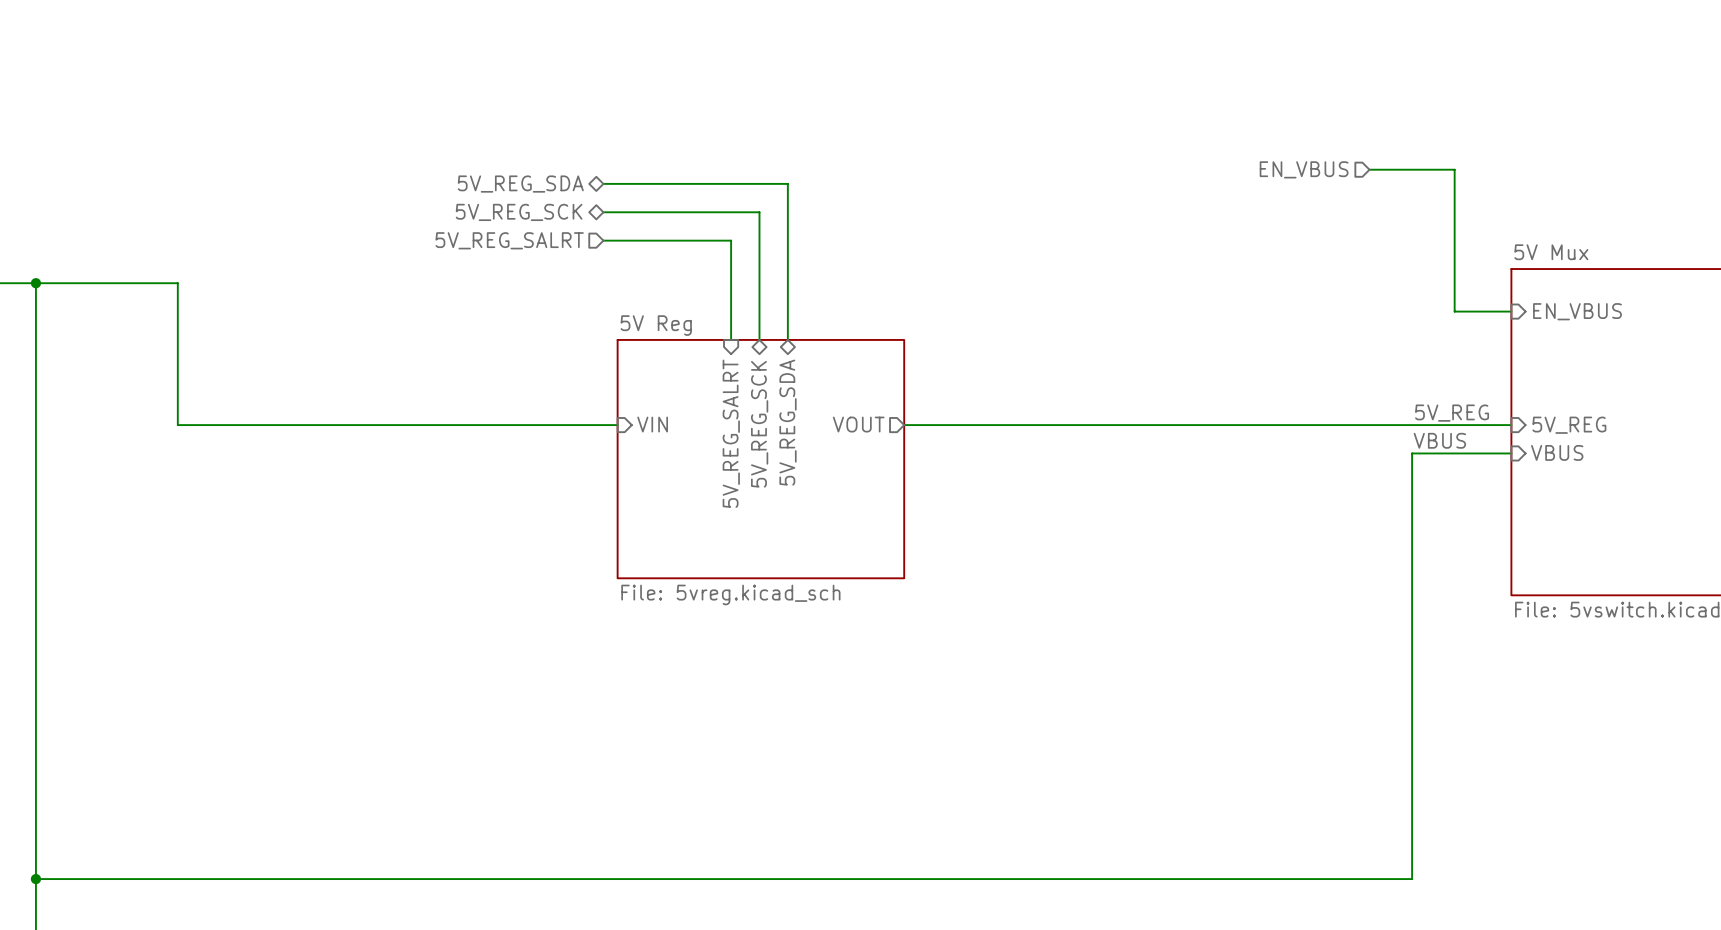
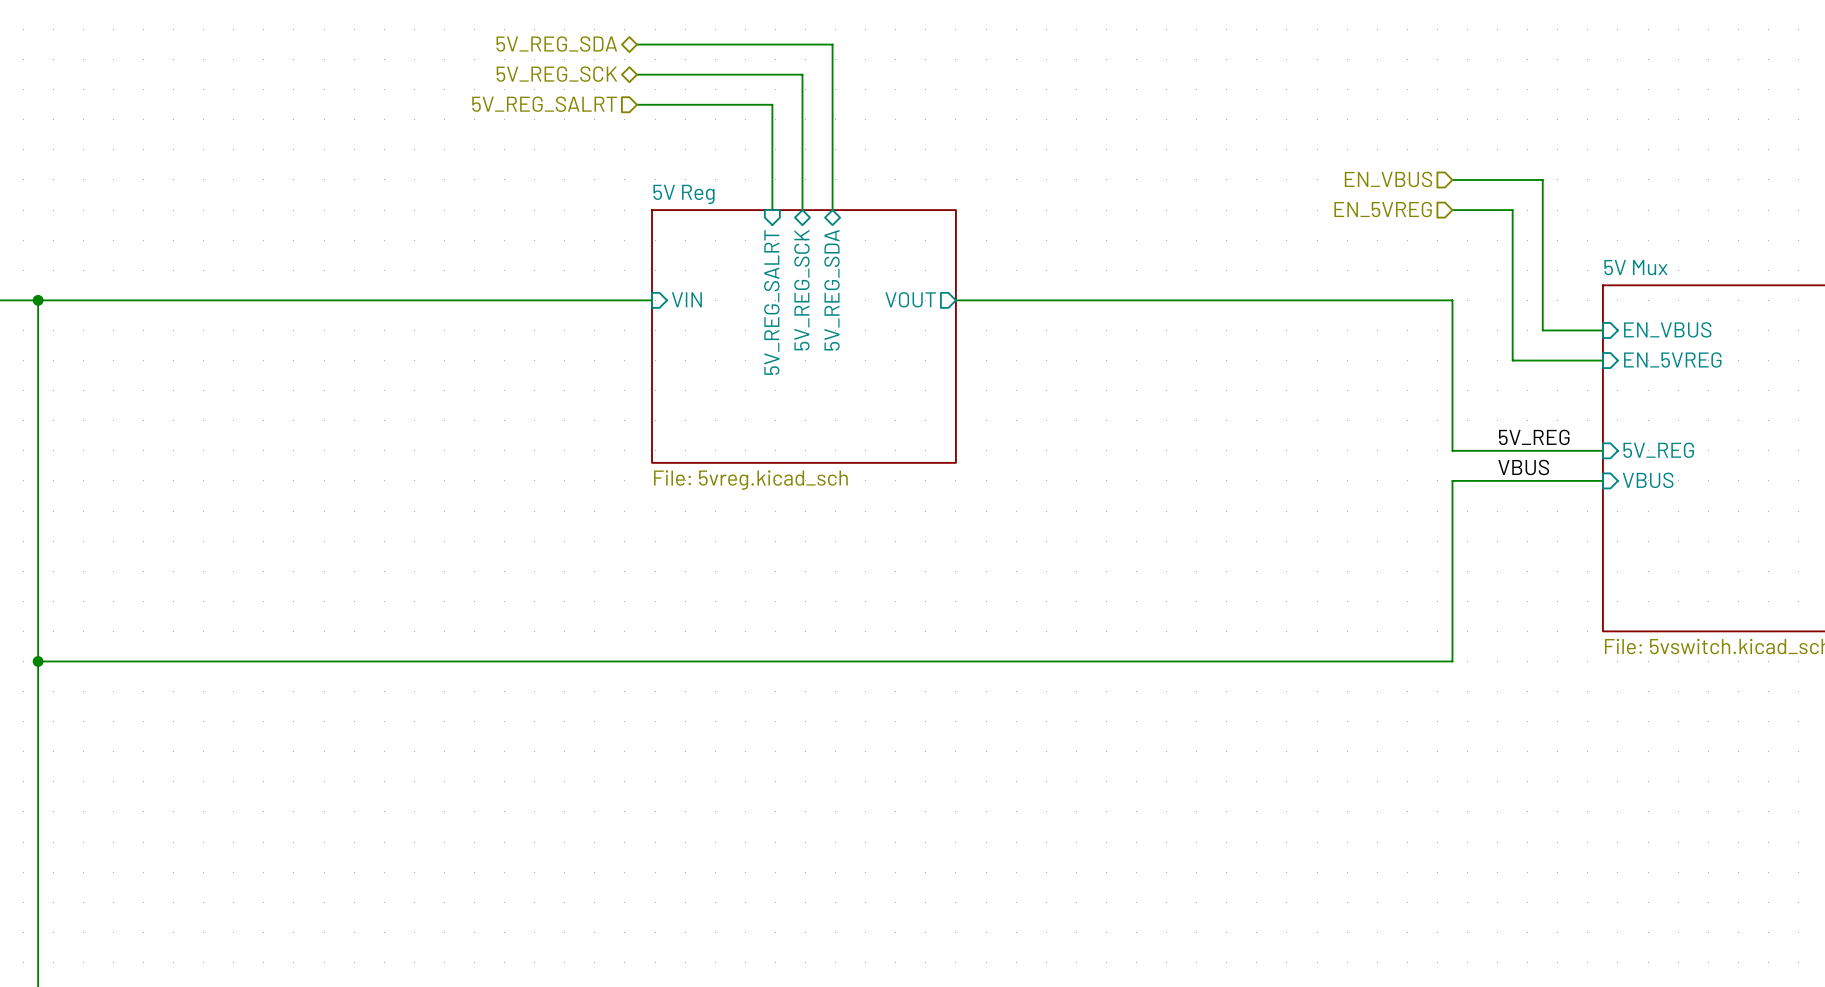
wire: (603, 183) (787, 183) (787, 339) -> (636, 44) (832, 44) (832, 210)
hierarchical label position: 5V_REG_SDA (520, 184) -> 5V_REG_SDA (556, 44)
hierarchical label: none -> EN_5VREG (1383, 209)
wire: none -> (1452, 210) (1512, 210) (1512, 360) (1602, 360)
hierarchical label position: 5V_REG_SCK (519, 212) -> 5V_REG_SCK (556, 74)
wire: (603, 212) (759, 212) (759, 339) -> (636, 74) (802, 74) (802, 210)
hierarchical label position: 5V_REG_SALRT (509, 240) -> 5V_REG_SALRT (544, 104)
wire: (603, 240) (731, 240) (731, 339) -> (636, 104) (772, 104) (772, 210)
wire: (177, 283) (177, 425) (617, 425) -> (188, 300) (652, 300)
sheet pin: none -> EN_5VREG (1672, 359)
sheet pin position: 5V_REG_SDA (788, 422) -> 5V_REG_SDA (832, 290)
sheet pin position: VIN (652, 424) -> VIN (686, 299)
sheet pin position: 5V_REG_SCK (759, 424) -> 5V_REG_SCK (801, 290)
sheet pin position: VOUT (858, 424) -> VOUT (910, 299)
wire: (904, 425) (1369, 425) -> (955, 300) (1452, 300) (1452, 450)
sheet pin position: 5V_REG_SALRT (731, 433) -> 5V_REG_SALRT (771, 302)
wire: (1412, 453) (1412, 879) (35, 879) -> (1497, 480) (1452, 480) (1452, 661) (38, 661)
sheet 5V Reg position: (760, 459) -> (803, 336)
junction: none -> (38, 661)
junction: (35, 879) -> none

